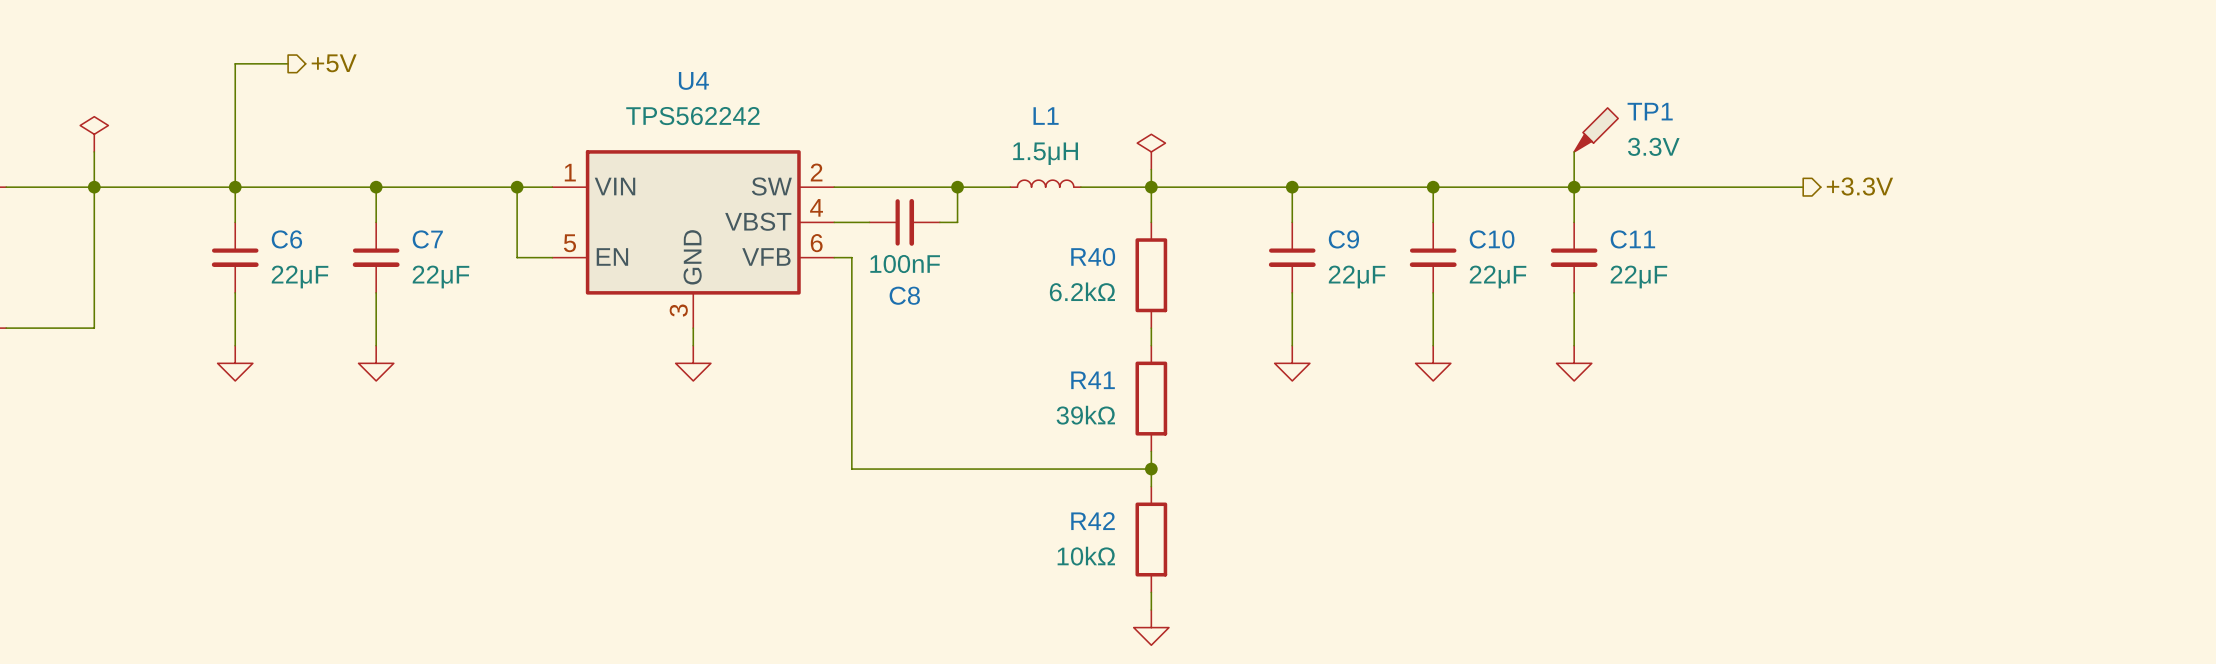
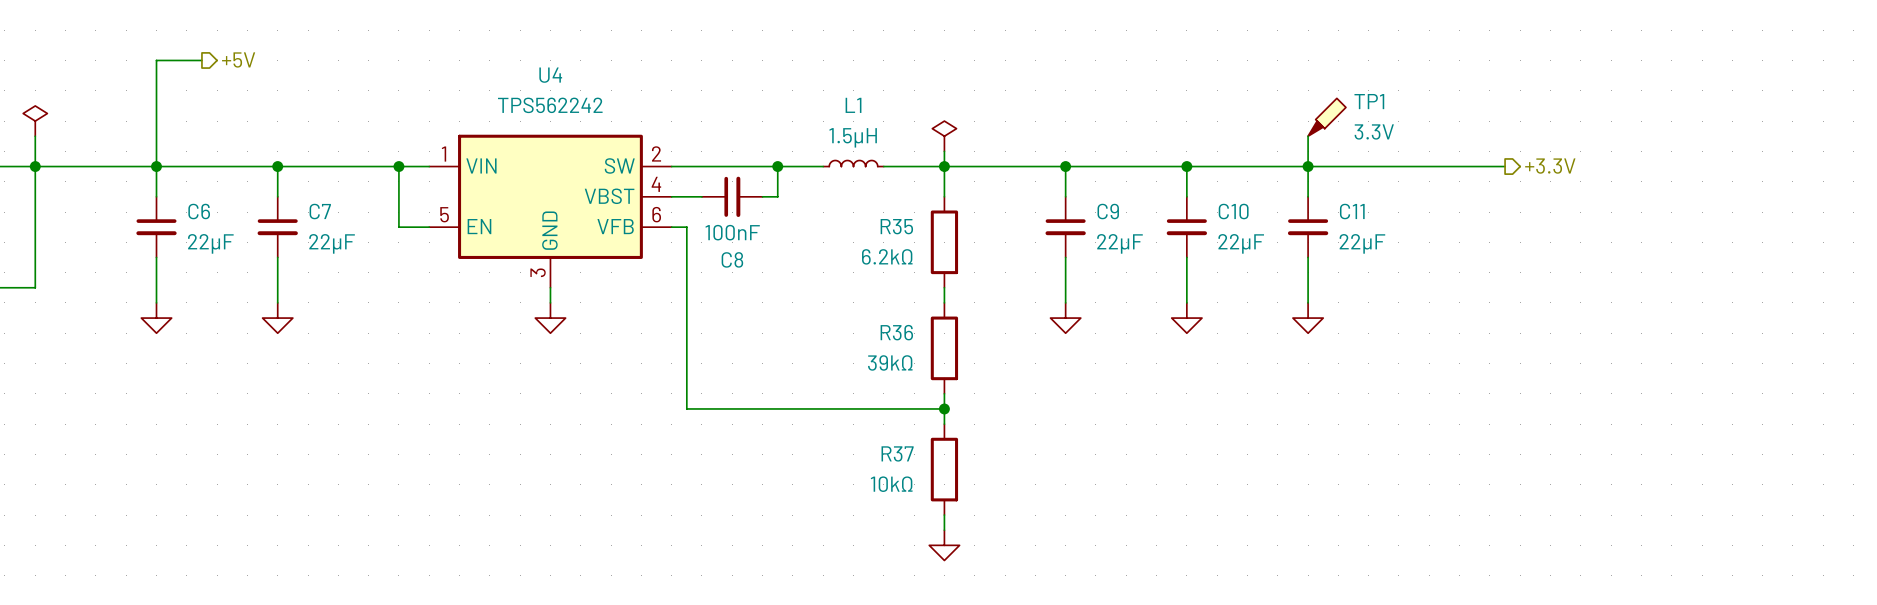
R40 name: R40 (1093, 256) -> R35 (896, 226)
R41 name: R41 (1093, 380) -> R36 (896, 332)
R42 name: R42 (1093, 521) -> R37 (897, 453)

